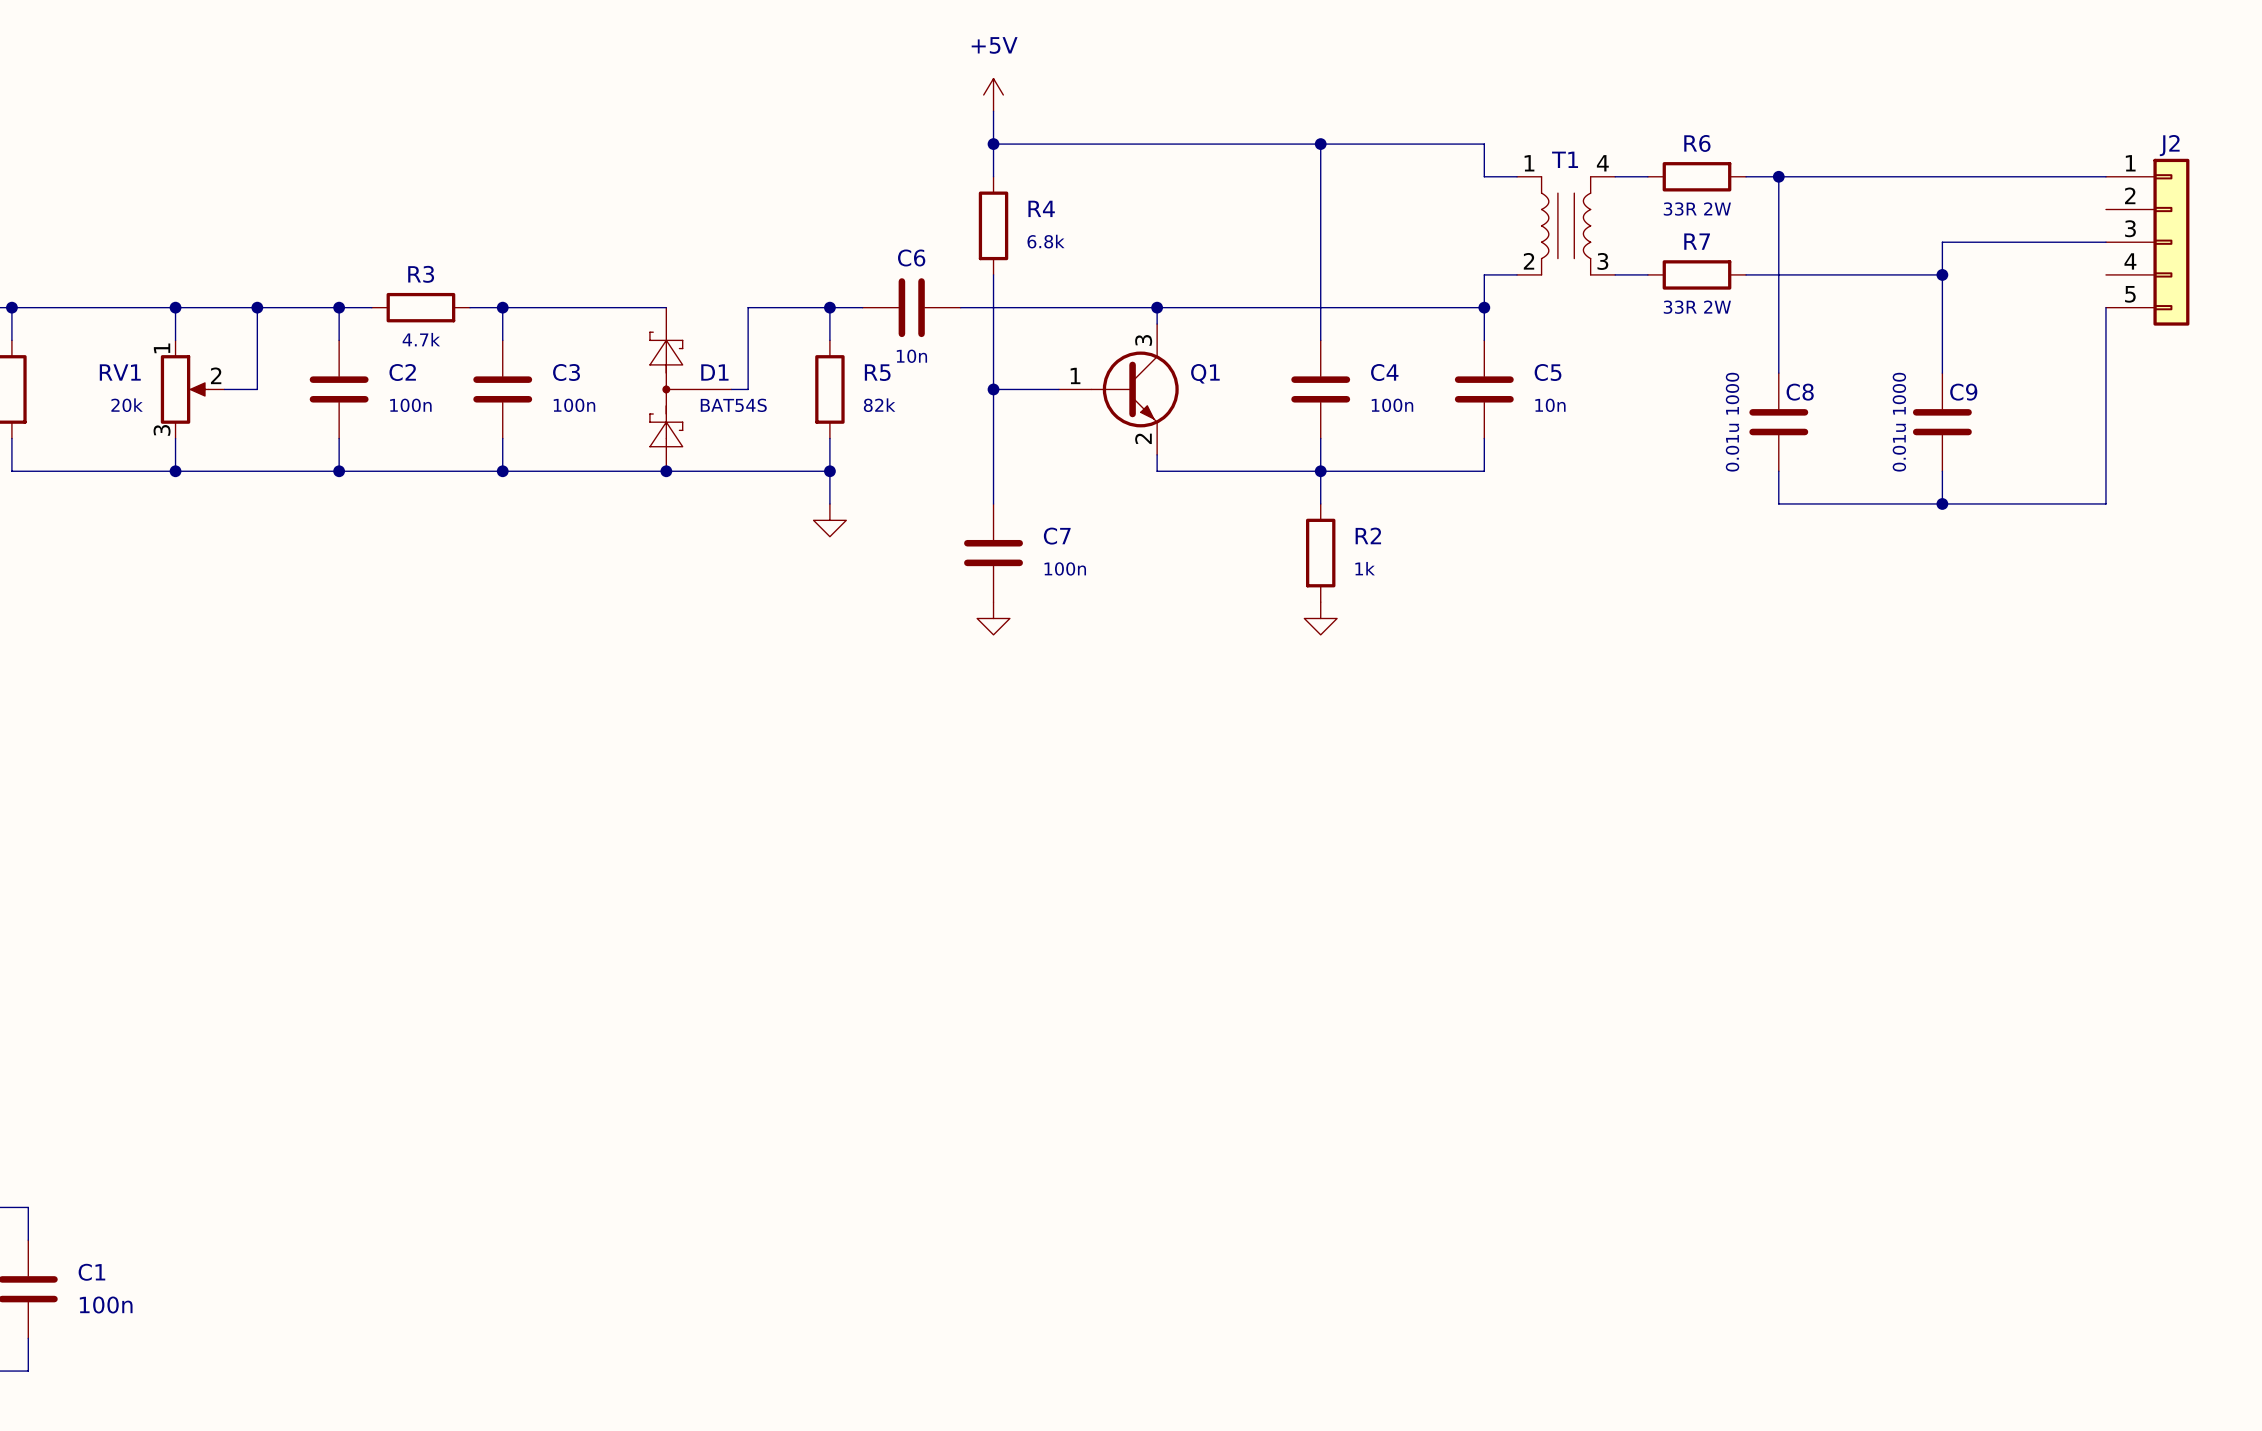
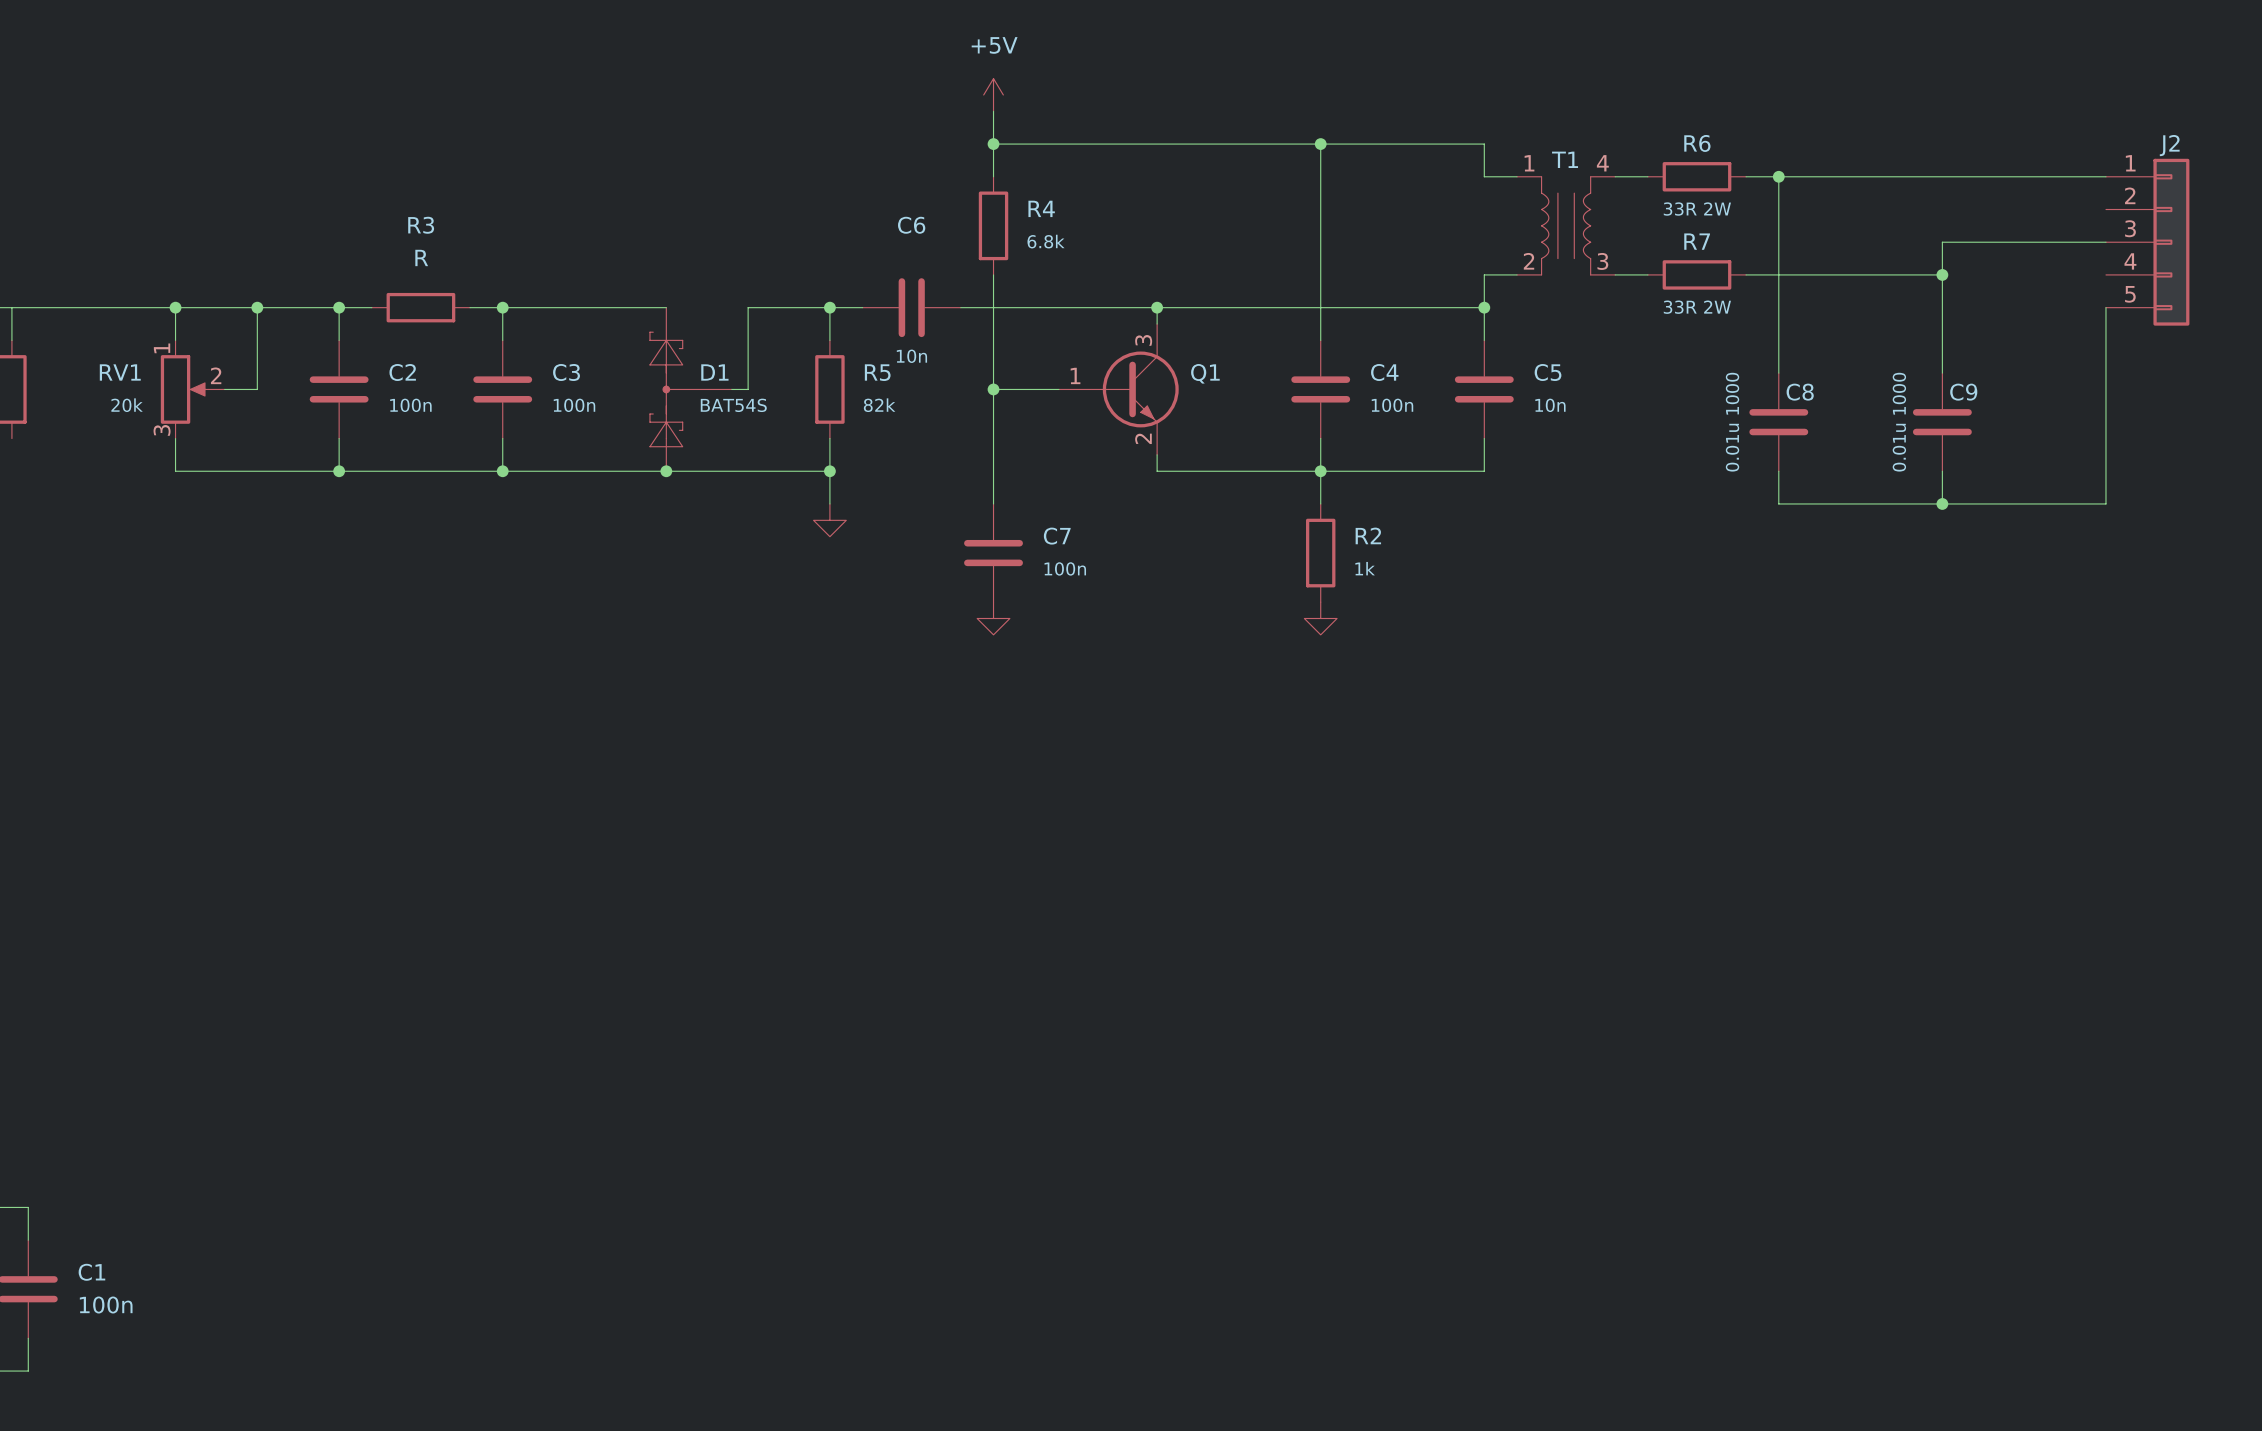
C6 name position: C6 (911, 257) -> C6 (911, 225)
R3 name position: R3 (421, 274) -> R3 (421, 225)
junction: (11, 307) -> none
R3 value: 4.7k (421, 339) -> R (421, 257)
wire: (11, 438) (11, 471) (175, 471) -> none
junction: (175, 471) -> none

